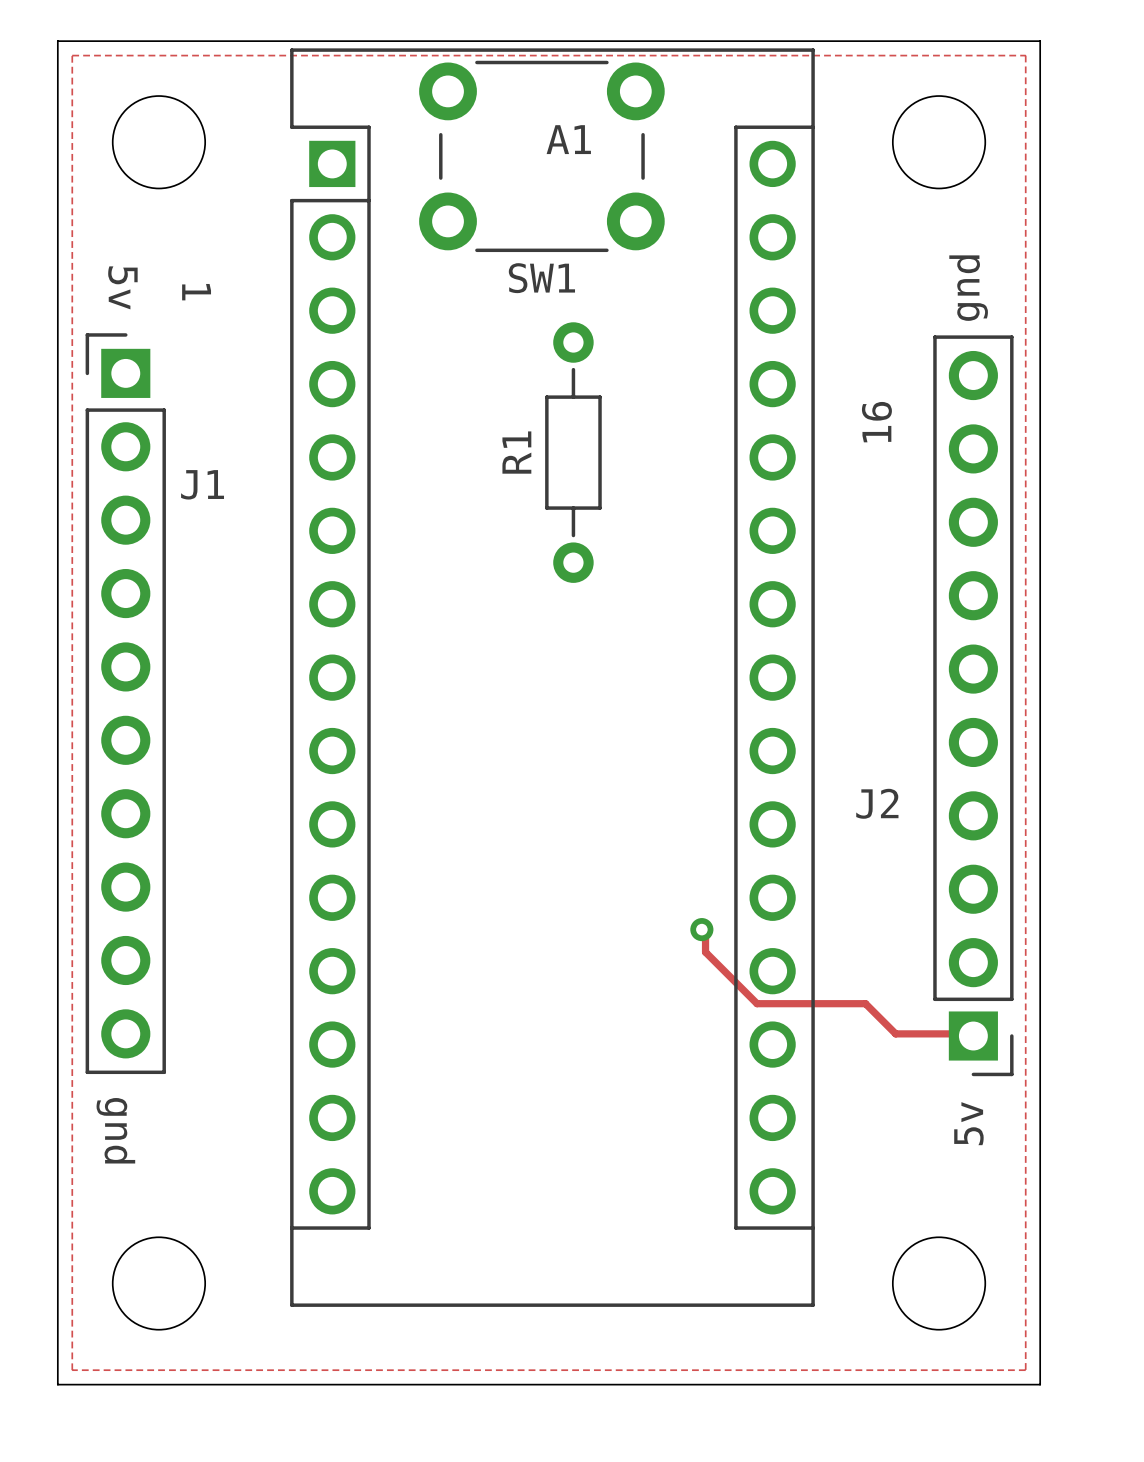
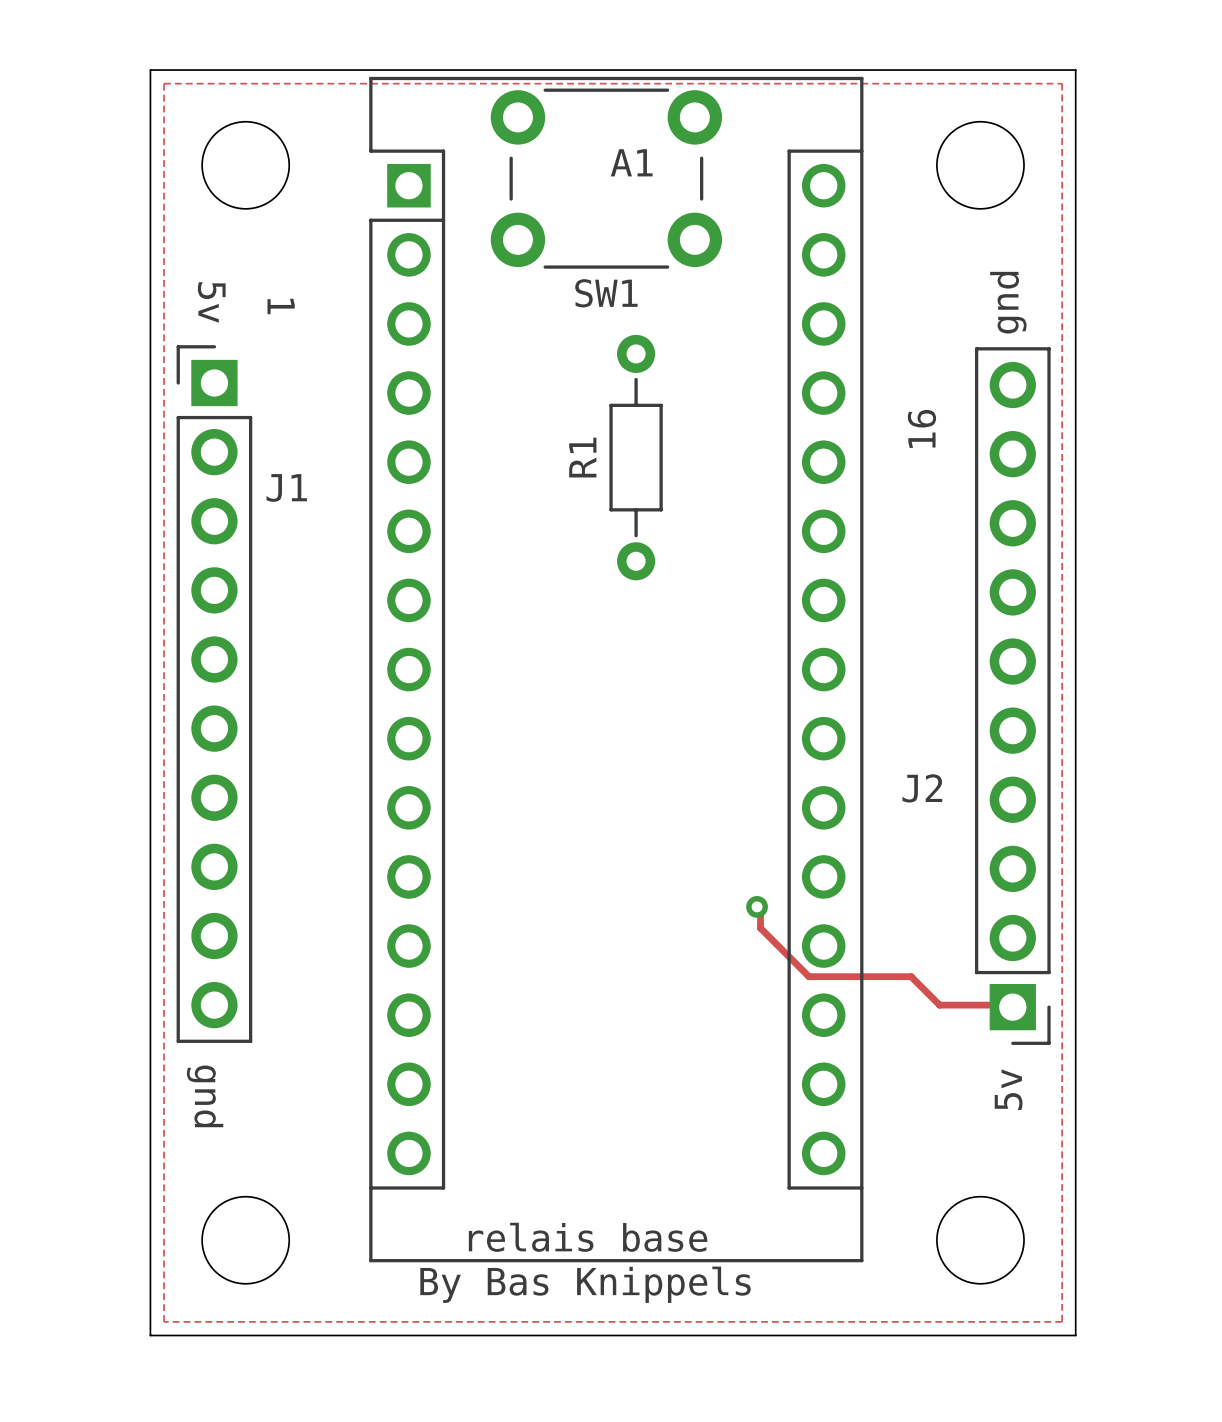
text: none -> relais base (588, 1237)
text: none -> By Bas Knippels (585, 1284)

